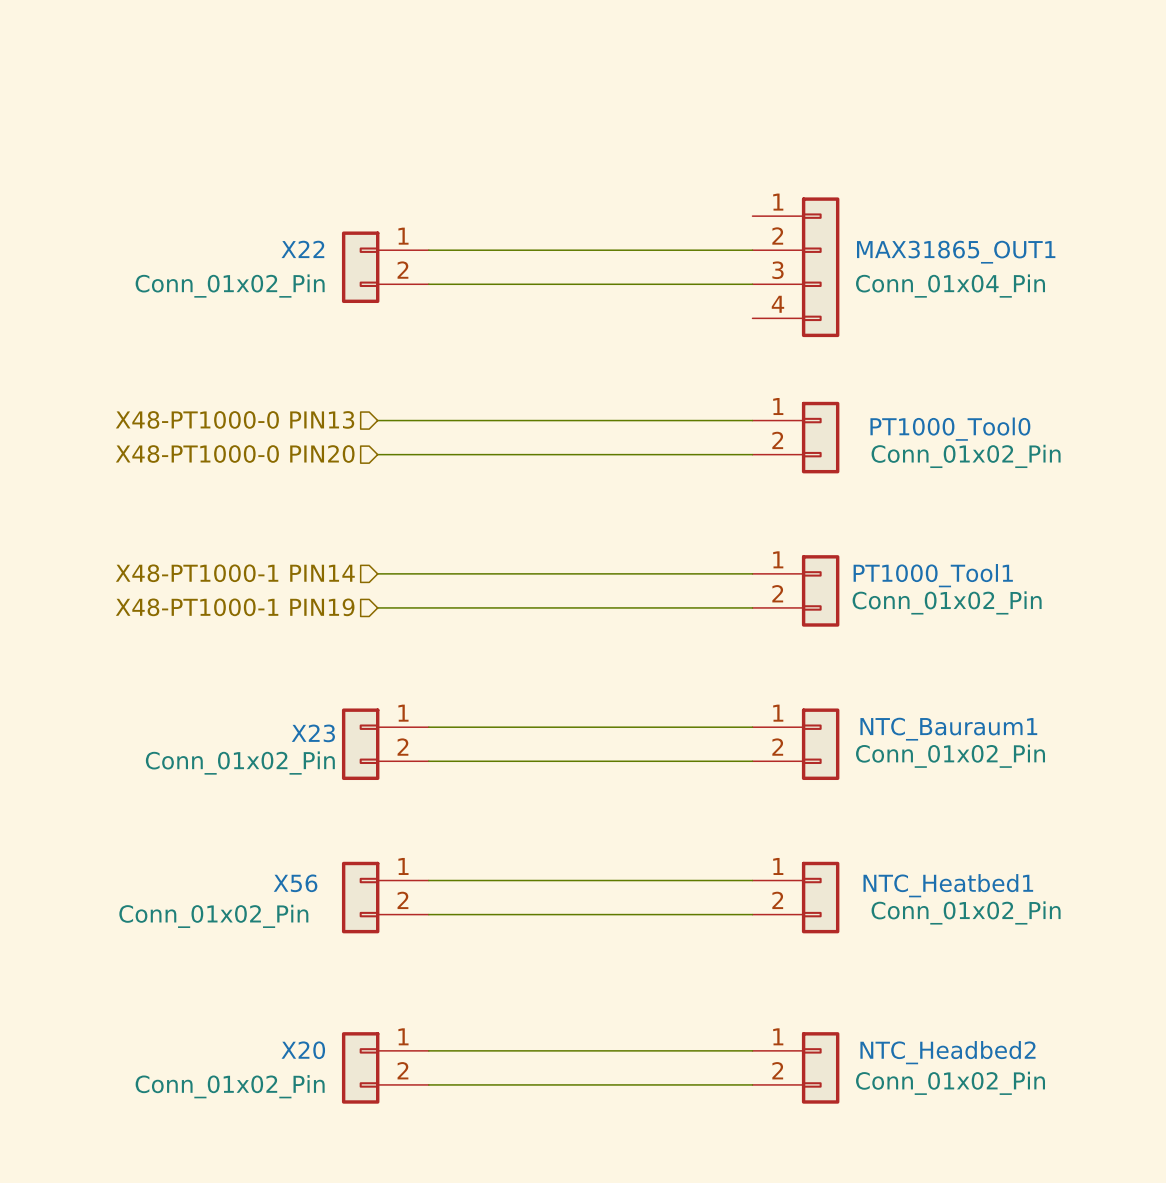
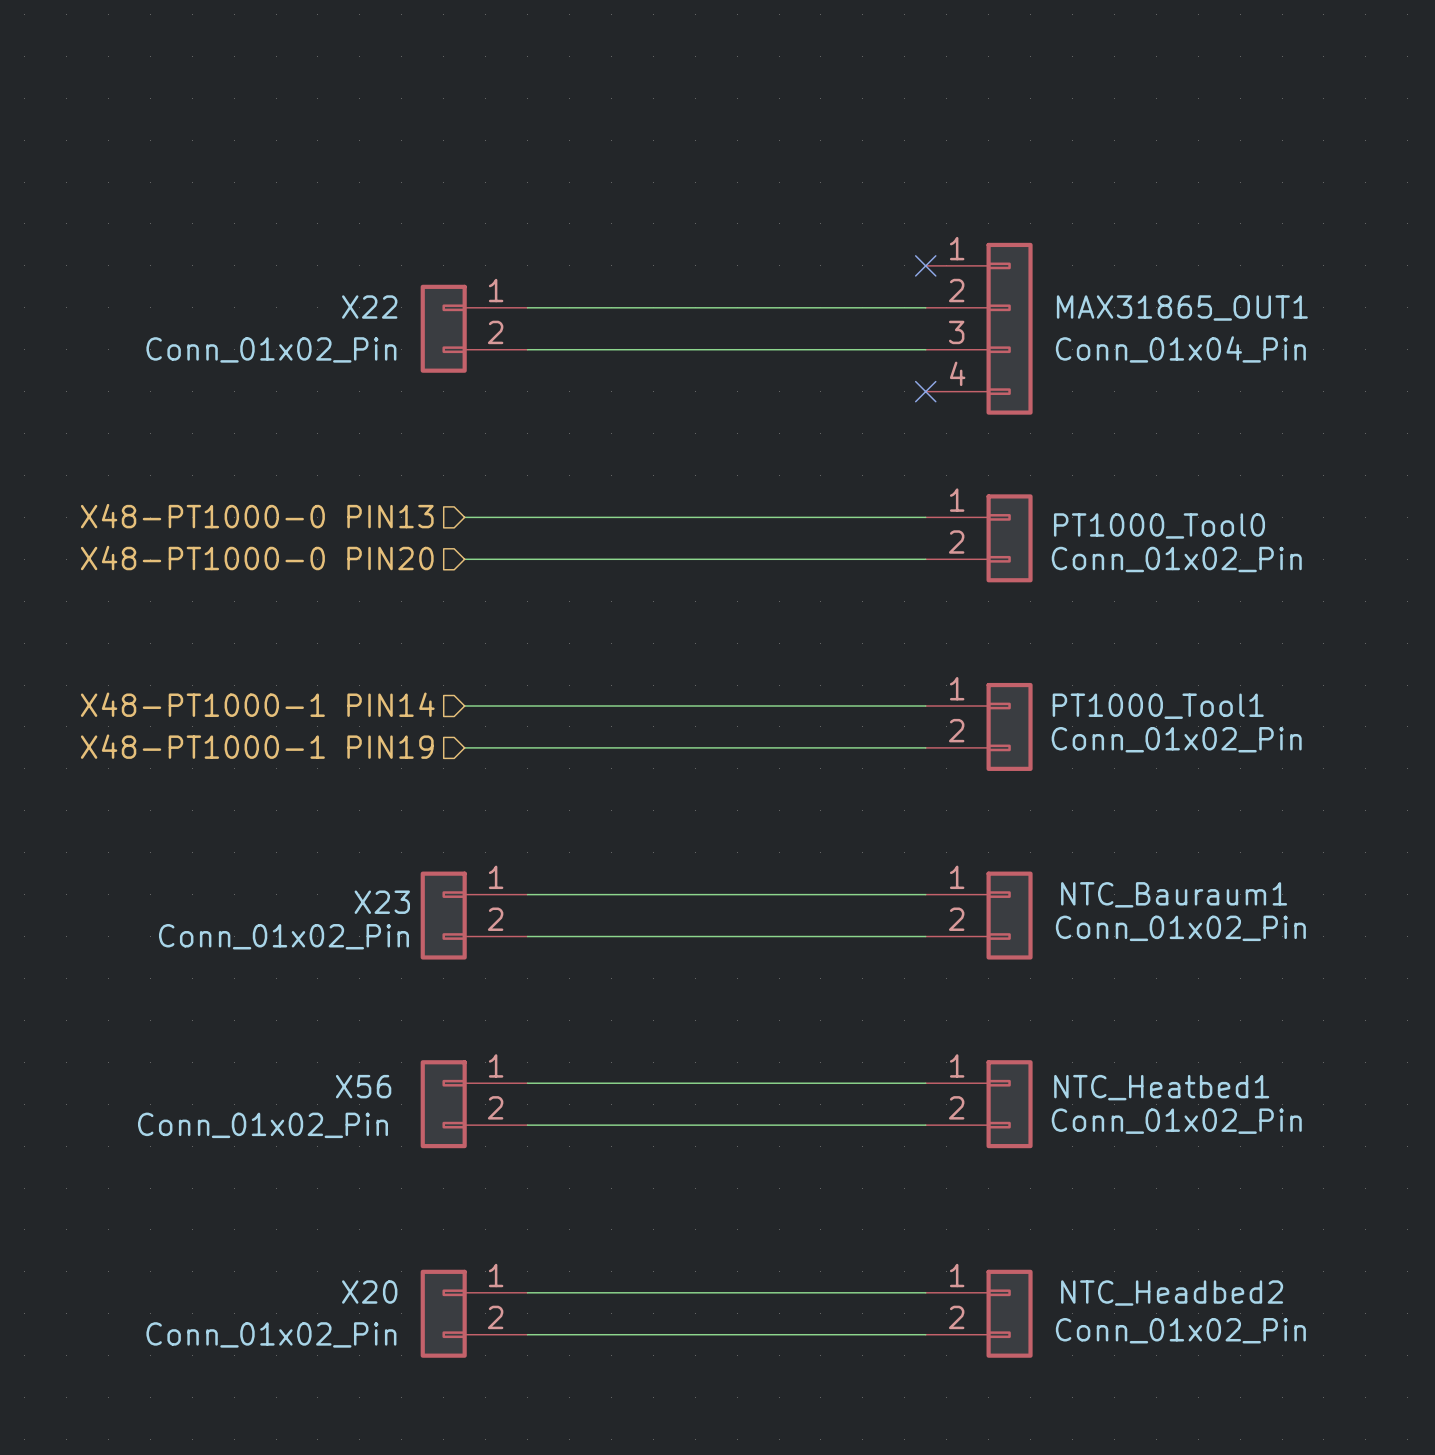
no-connect mark: none -> (925, 265)
no-connect mark: none -> (925, 391)

